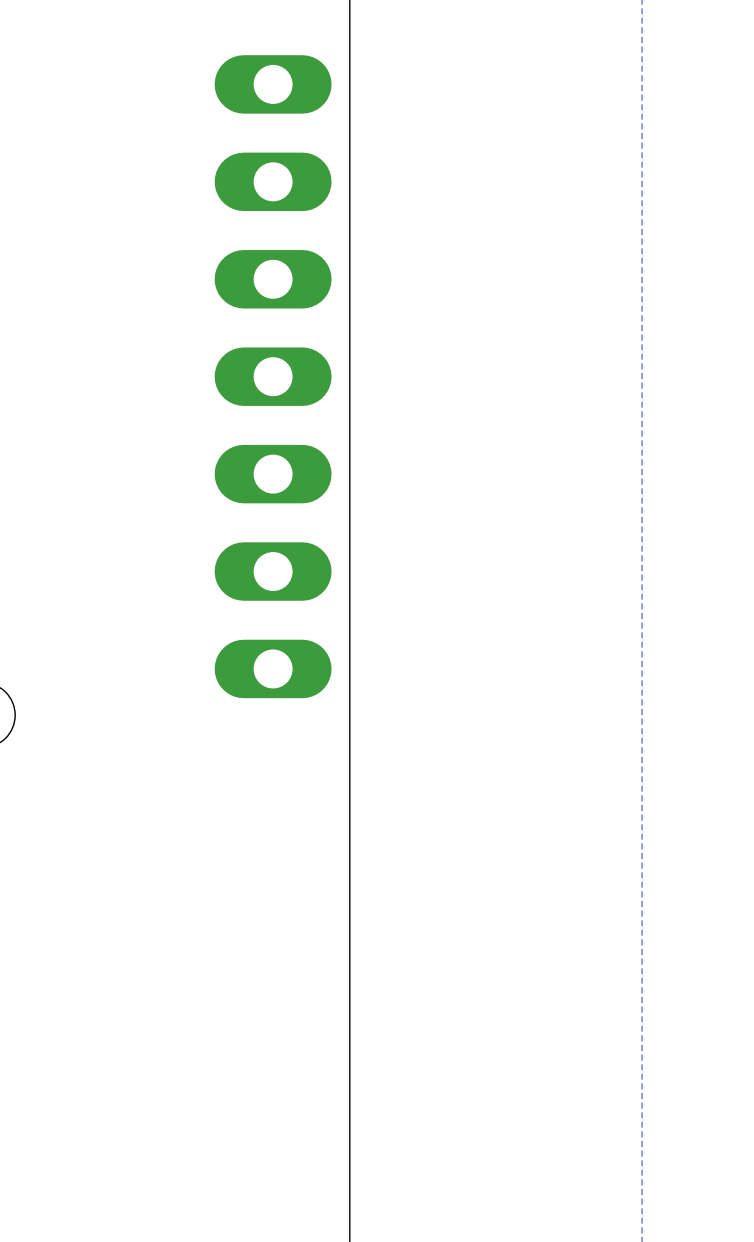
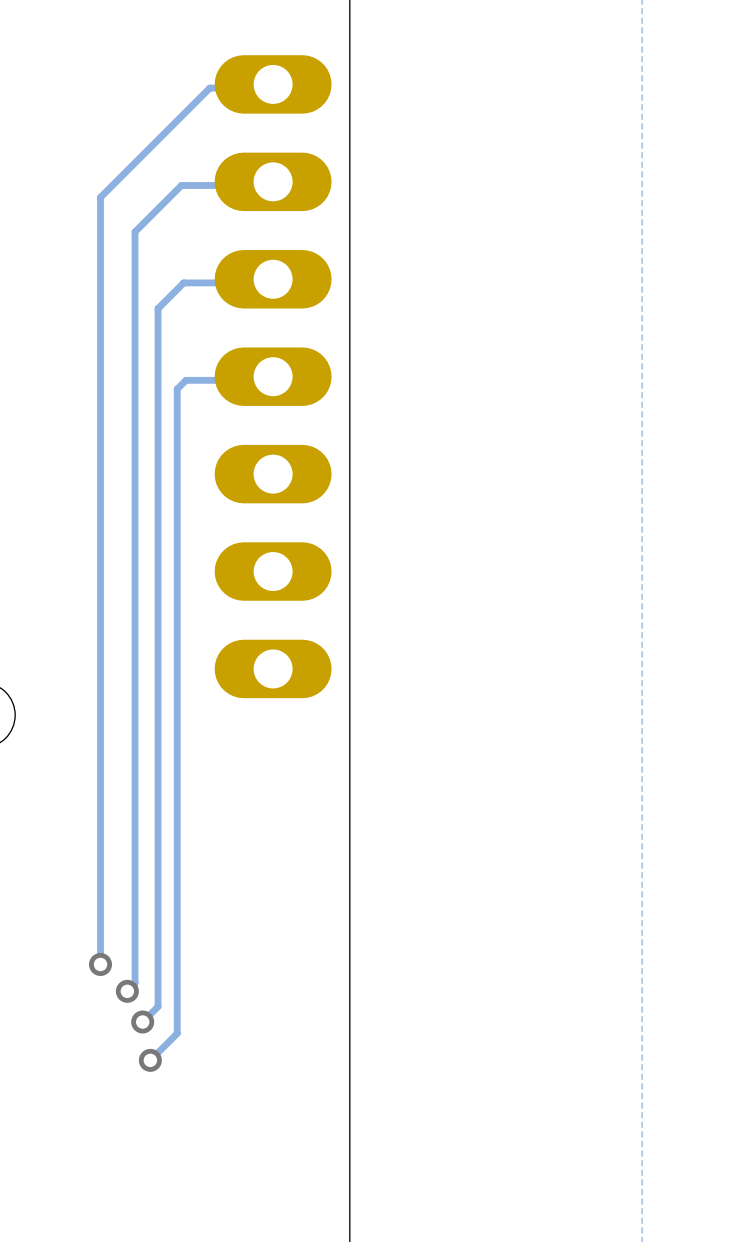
track: none -> (273, 88) (209, 88) (100, 197) (100, 964)
track: none -> (273, 185) (181, 185) (135, 231) (135, 983) (127, 991)
track: none -> (273, 282) (183, 282) (158, 308) (158, 1006) (142, 1022)
track: none -> (273, 380) (186, 380) (177, 389) (177, 1033) (150, 1060)
via: none -> (100, 964)
via: none -> (127, 991)
via: none -> (142, 1022)
via: none -> (150, 1060)

